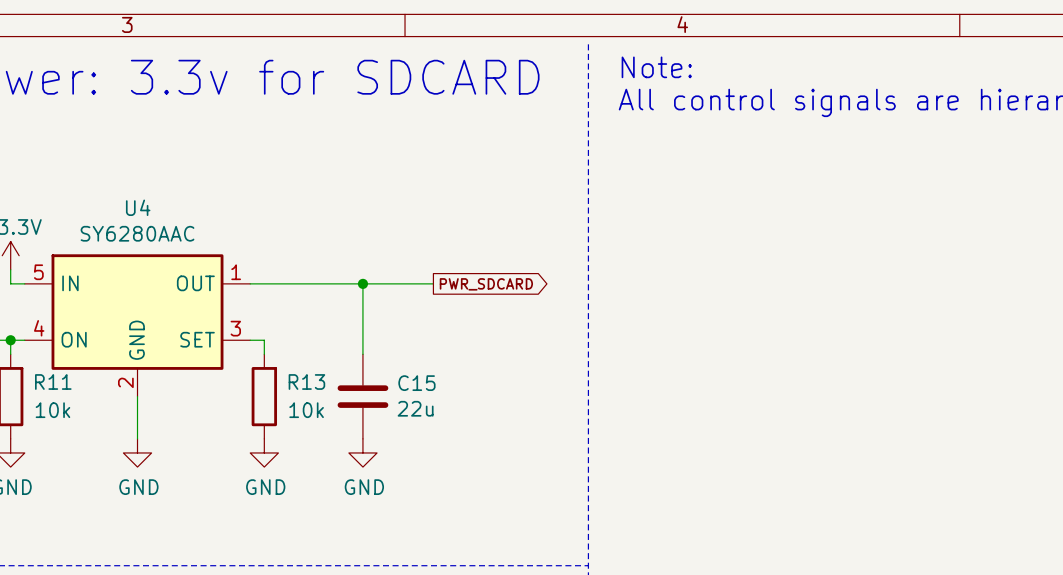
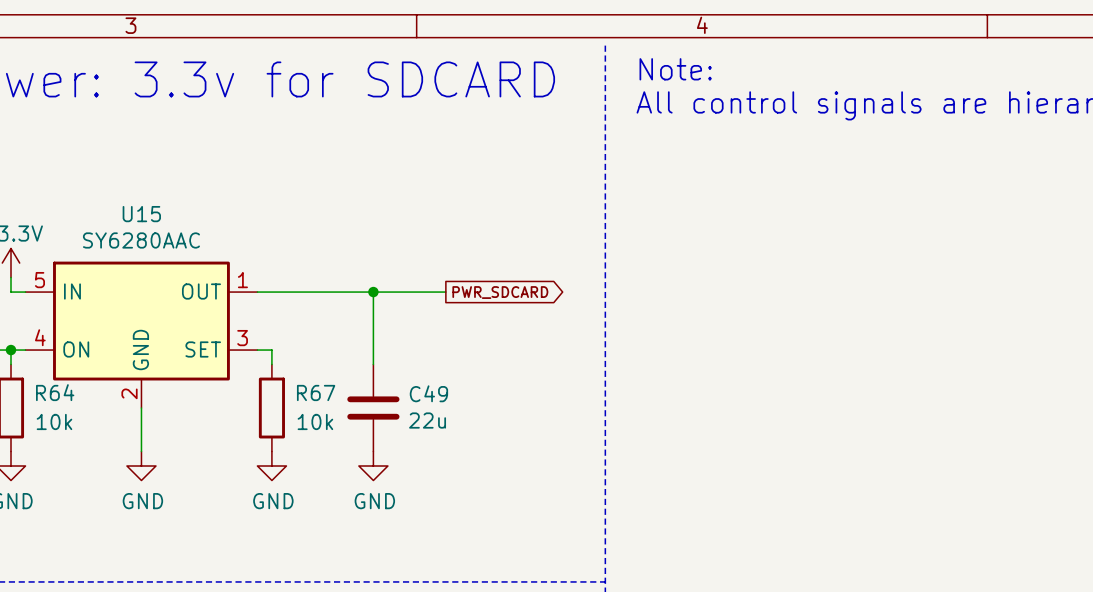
U4 name: U4 (138, 207) -> U15 (141, 214)
R11 name: R11 (53, 381) -> R64 (55, 392)
R13 name: R13 (306, 381) -> R67 (316, 392)
C15 name: C15 (416, 383) -> C49 (428, 393)

